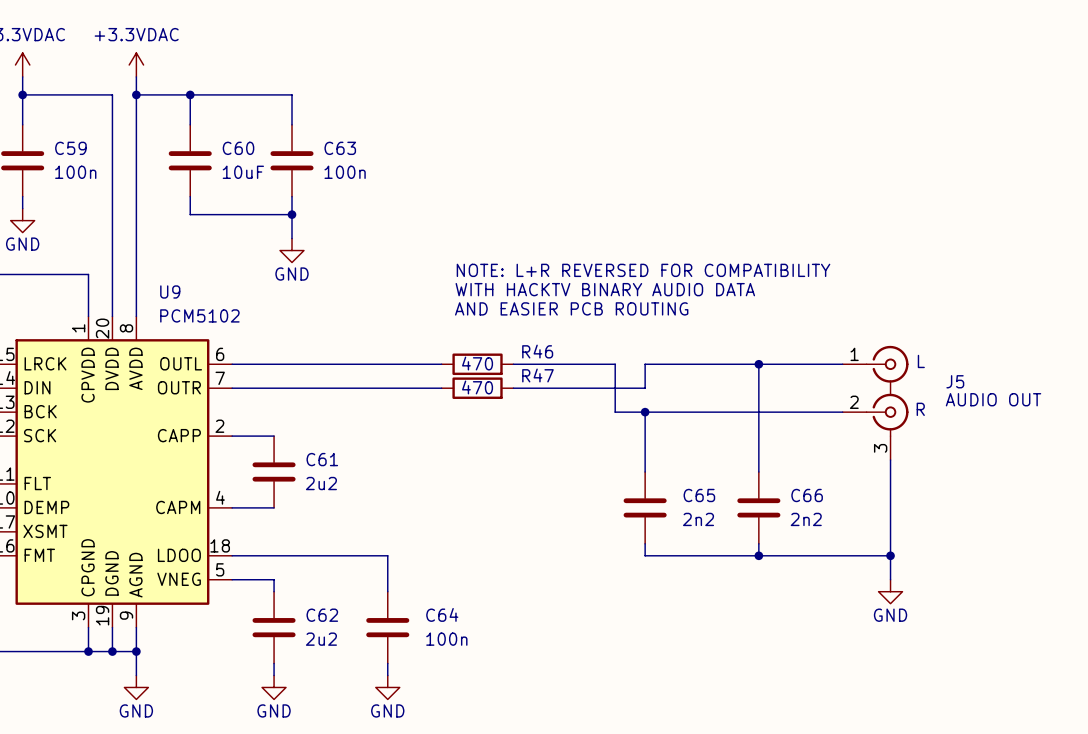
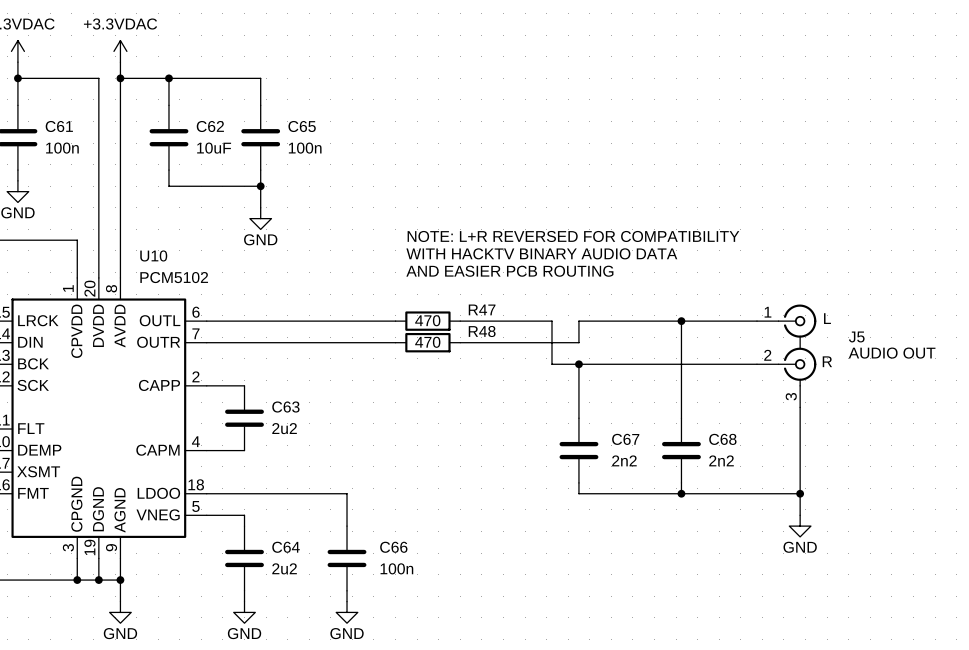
C59 name: C59 (70, 148) -> C61 (59, 126)
C60 name: C60 (238, 148) -> C62 (210, 126)
C63 name: C63 (340, 148) -> C65 (302, 126)
U9 name: U9 (170, 291) -> U10 (153, 255)
R46 name: R46 (537, 351) -> R47 (482, 309)
R47 name: R47 (537, 375) -> R48 (482, 331)
C61 name: C61 (322, 459) -> C63 (285, 407)
C65 name: C65 (699, 495) -> C67 (625, 439)
C66 name: C66 (807, 495) -> C68 (722, 439)
C64 name: C64 (442, 614) -> C66 (393, 547)
C62 name: C62 (322, 615) -> C64 (286, 547)

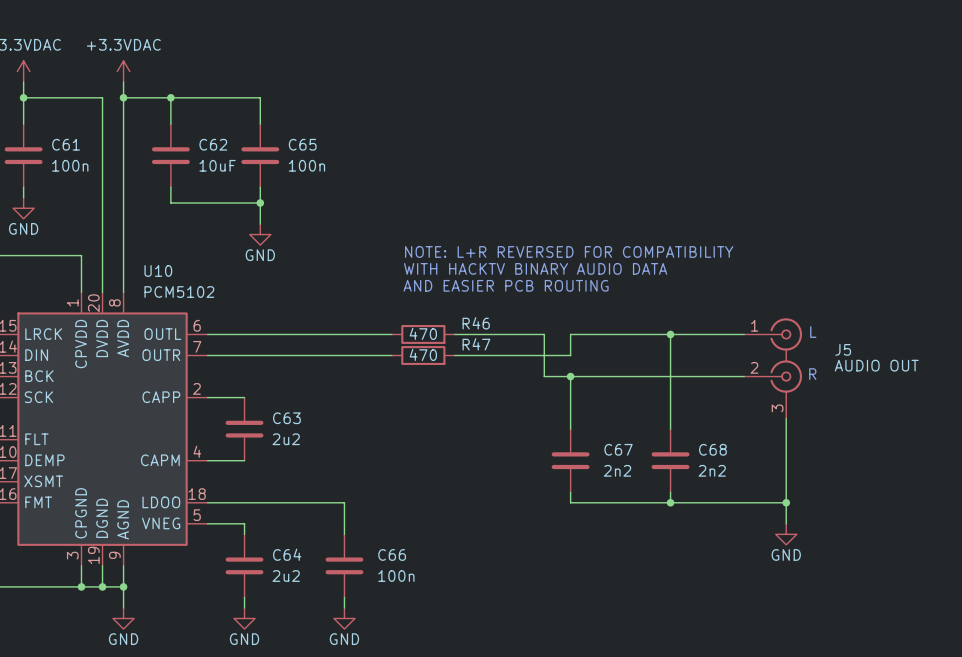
R47 name: R47 (482, 309) -> R46 (476, 323)
R48 name: R48 (482, 331) -> R47 (476, 344)

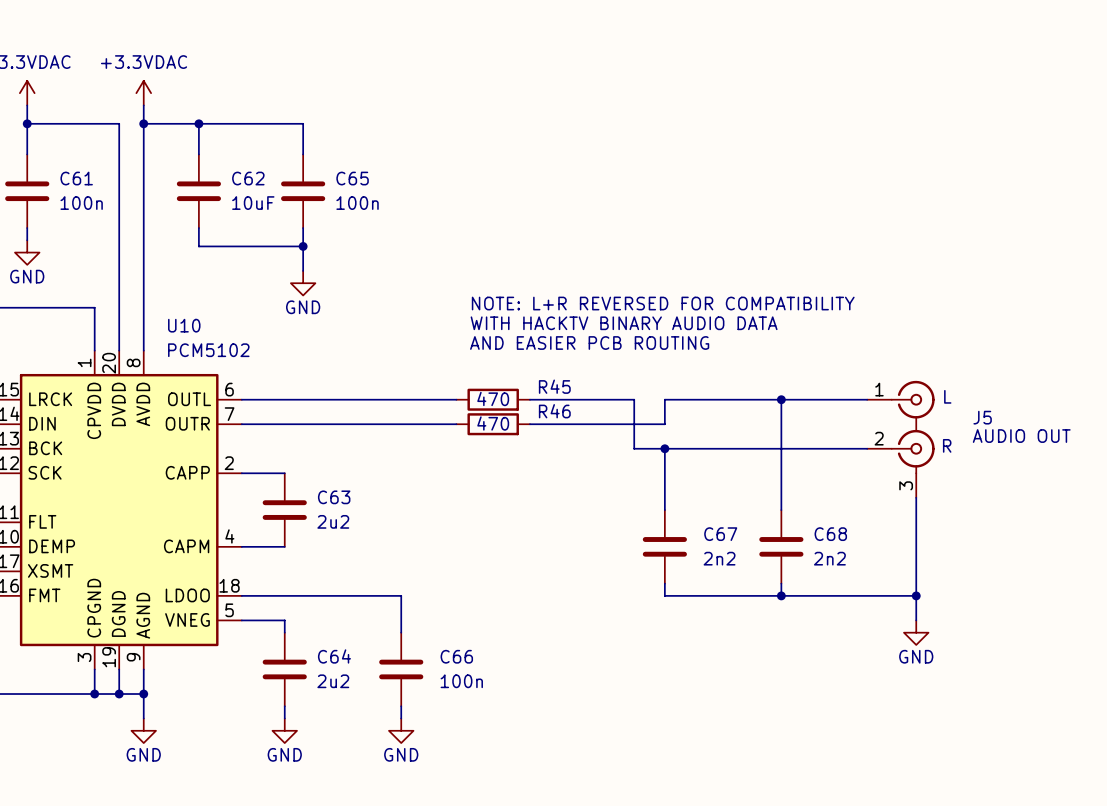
R46 name: R46 (476, 323) -> R45 (554, 386)
R47 name: R47 (476, 344) -> R46 (554, 411)

